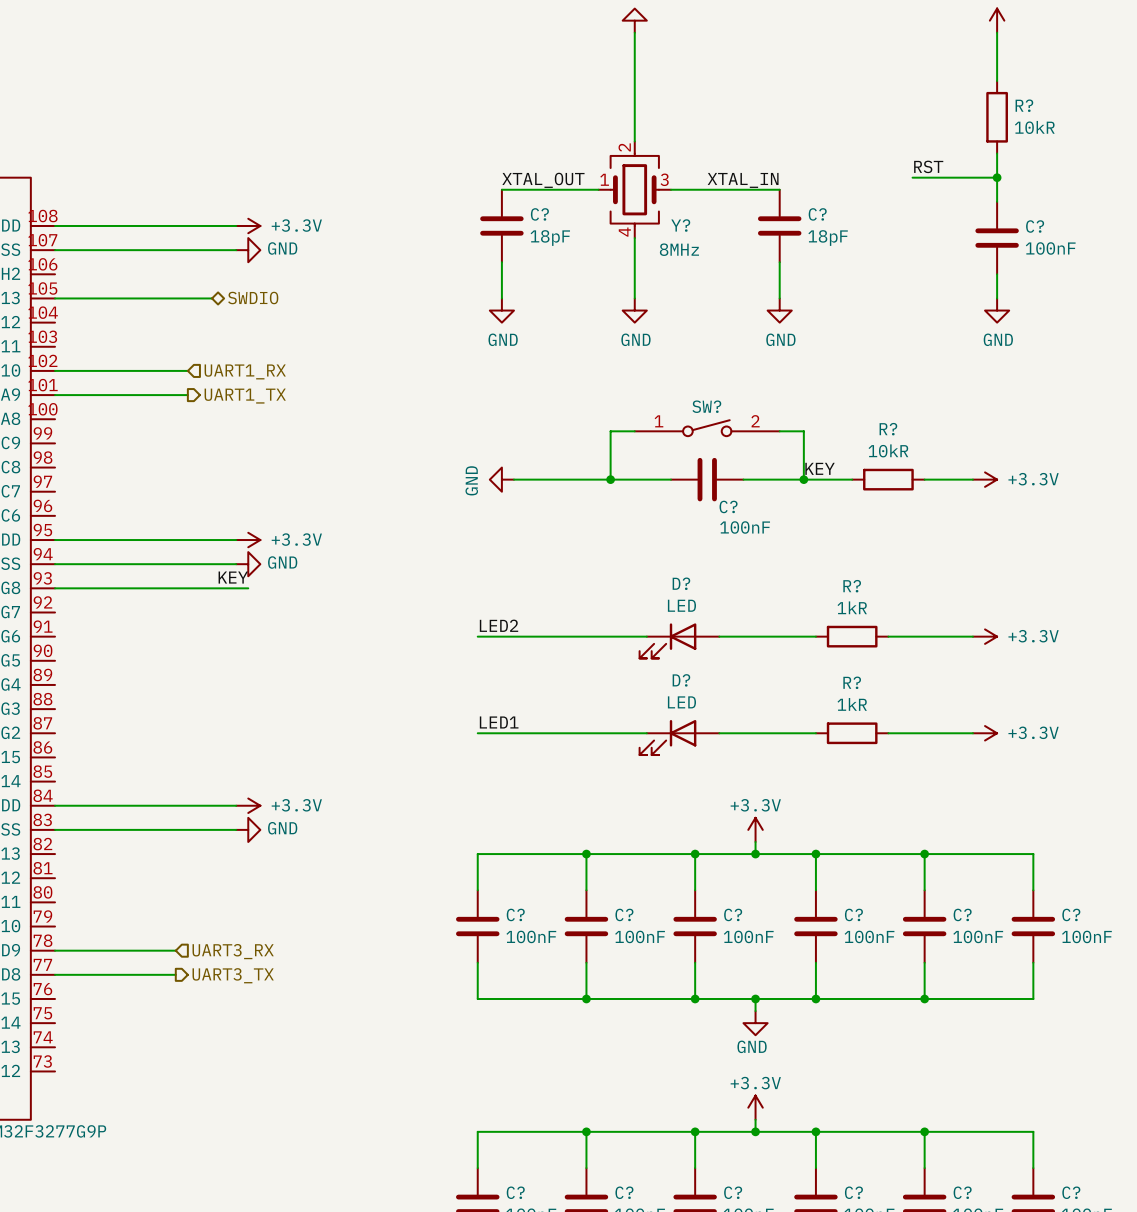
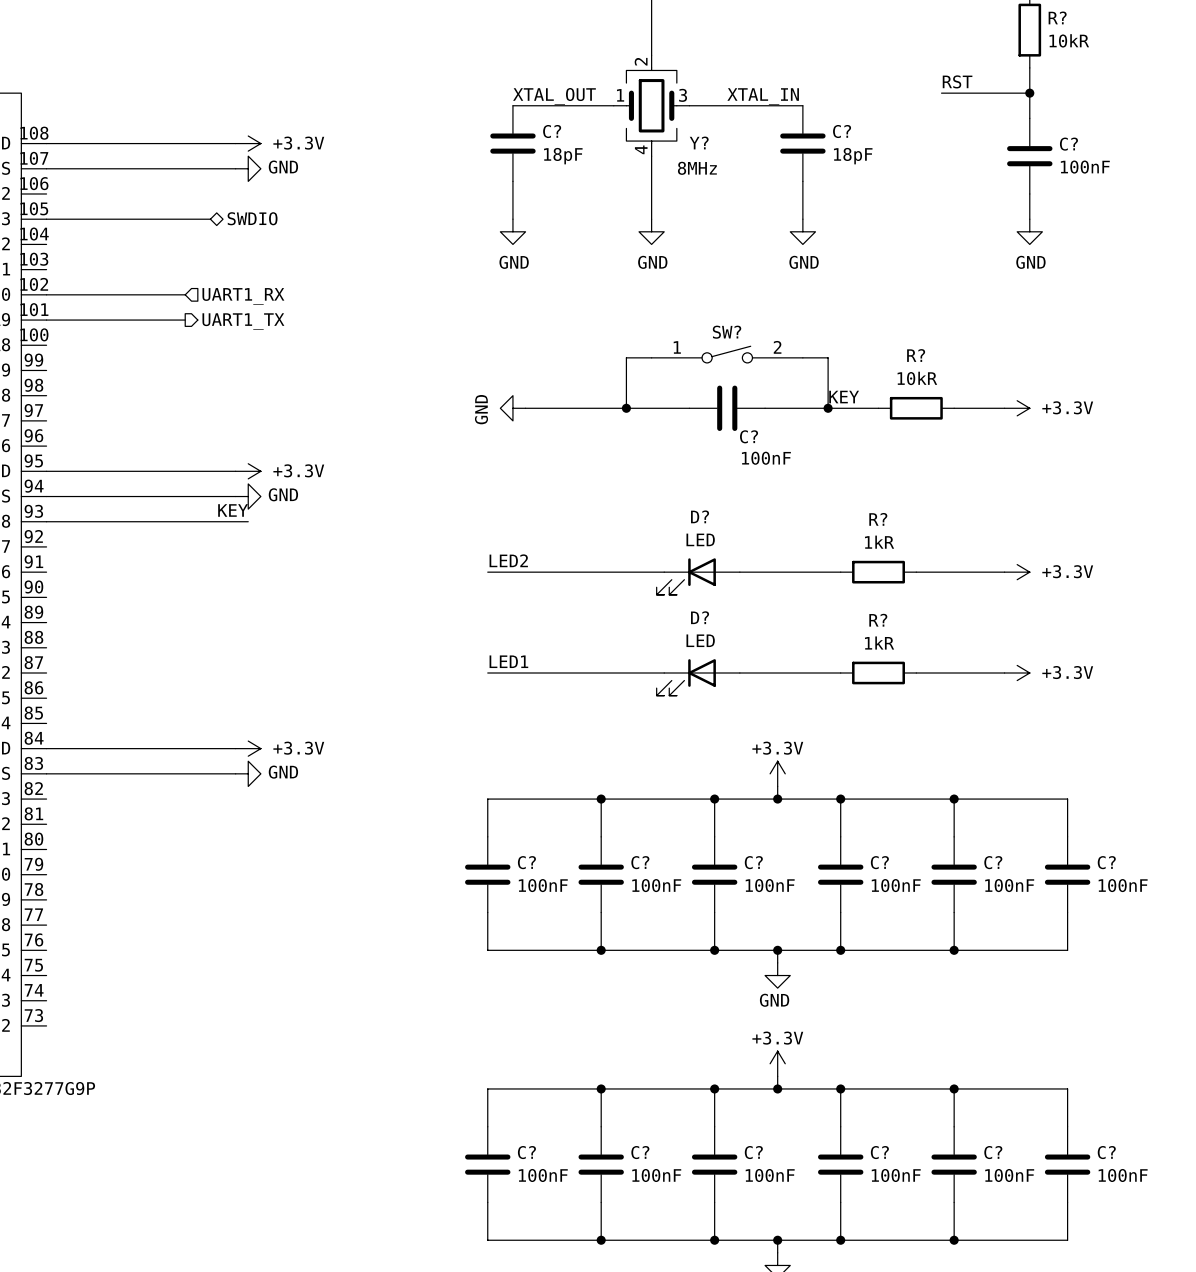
wire: (55, 950) (175, 950) -> none
hierarchical label: UART3_RX (233, 951) -> none
wire: (55, 974) (175, 974) -> none
hierarchical label: UART3_TX (233, 975) -> none

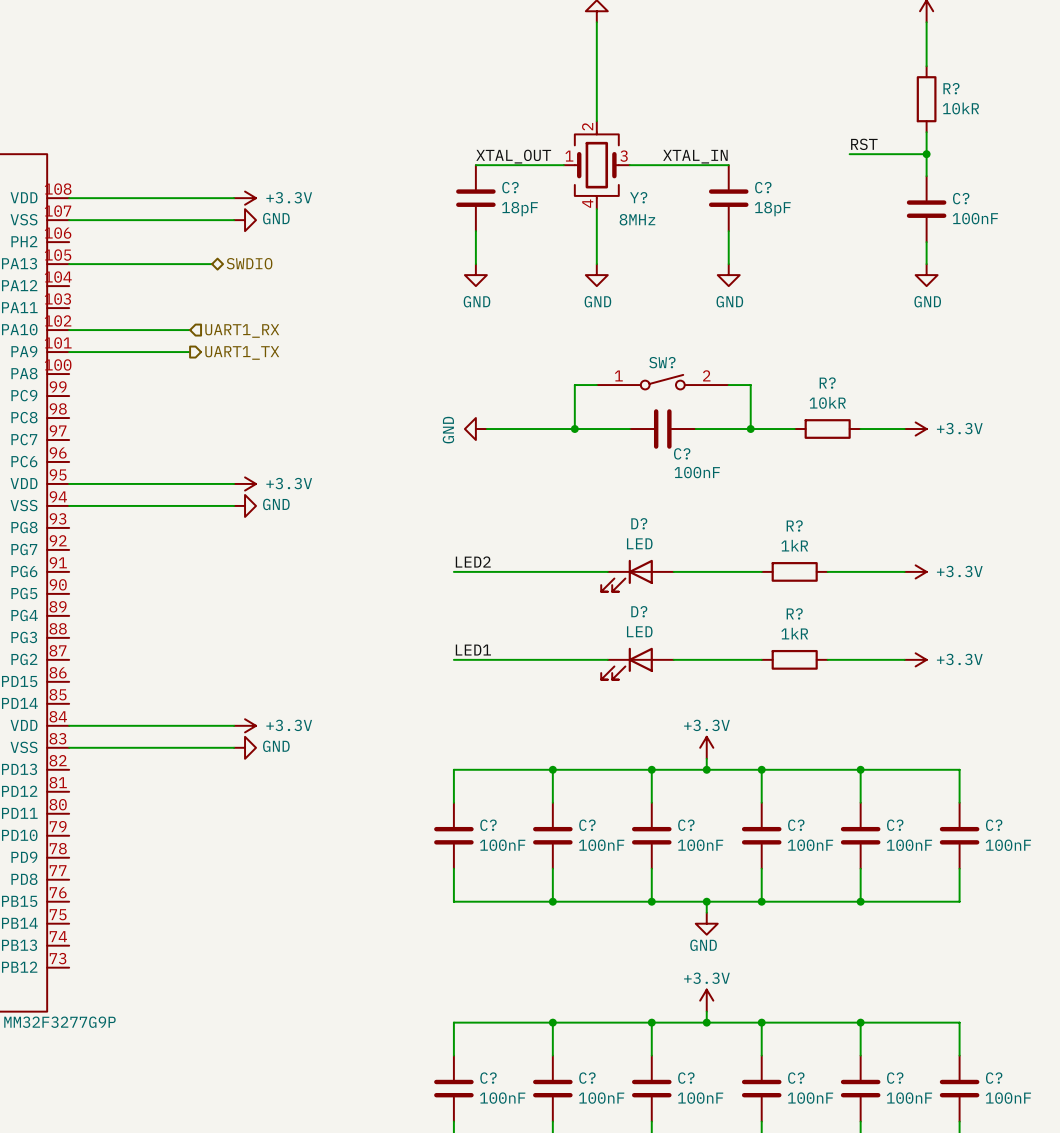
label: KEY (844, 397) -> none
label: KEY (233, 510) -> none
wire: (46, 521) (248, 521) -> none

